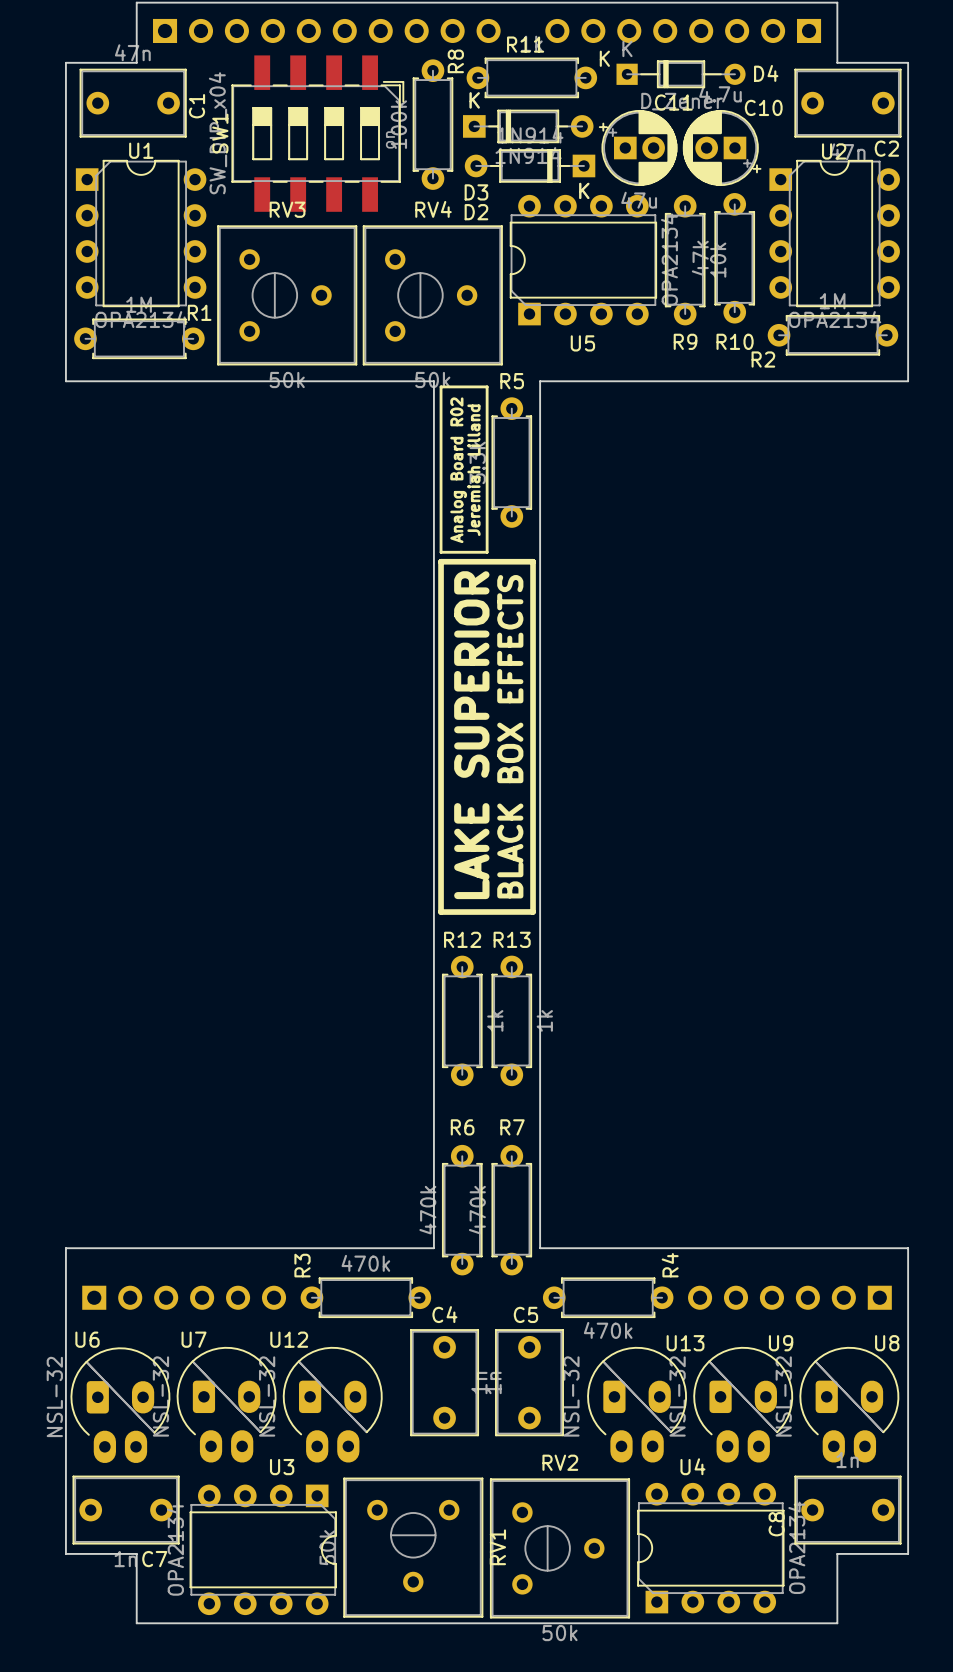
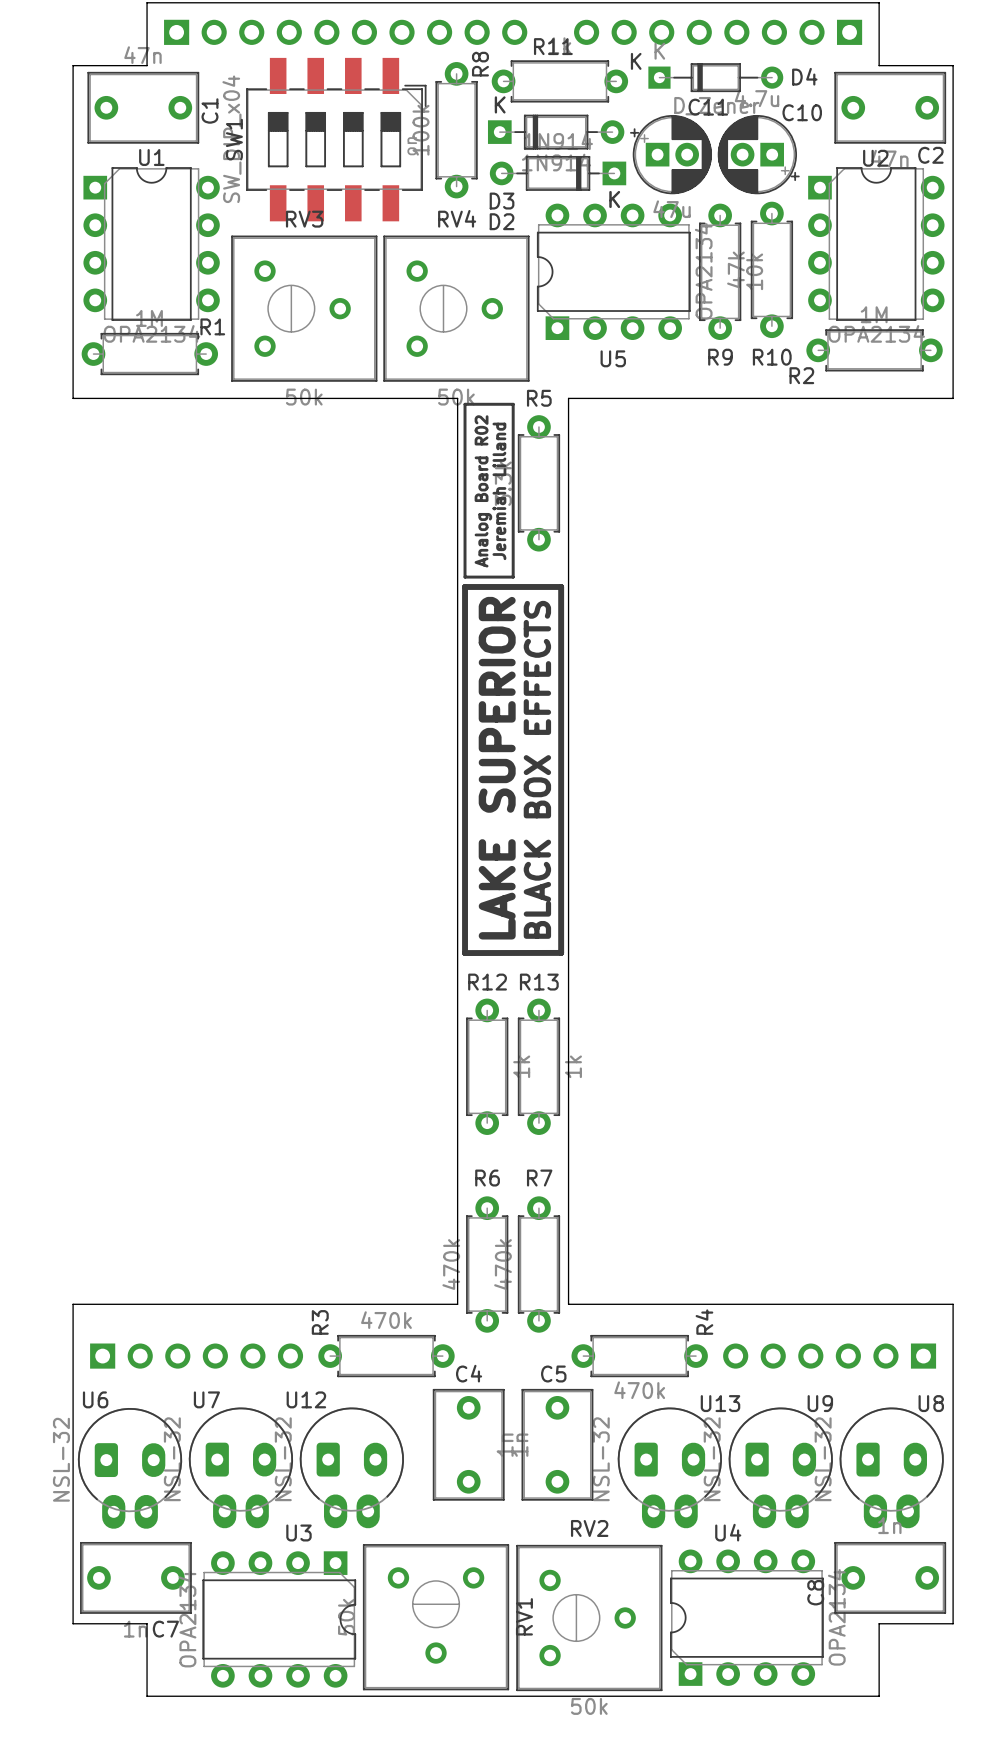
U7 footprint: [176, 1346, 277, 1463] -> [188, 1407, 294, 1529]
U12 footprint: [282, 1346, 383, 1463] -> [299, 1407, 405, 1529]
U13 footprint: [587, 1346, 687, 1463] -> [617, 1407, 722, 1529]
U9 footprint: [693, 1346, 794, 1463] -> [728, 1407, 833, 1529]
U8 footprint: [799, 1346, 900, 1463] -> [839, 1407, 944, 1529]
U6 footprint: [70, 1347, 171, 1464] -> [77, 1407, 183, 1529]

